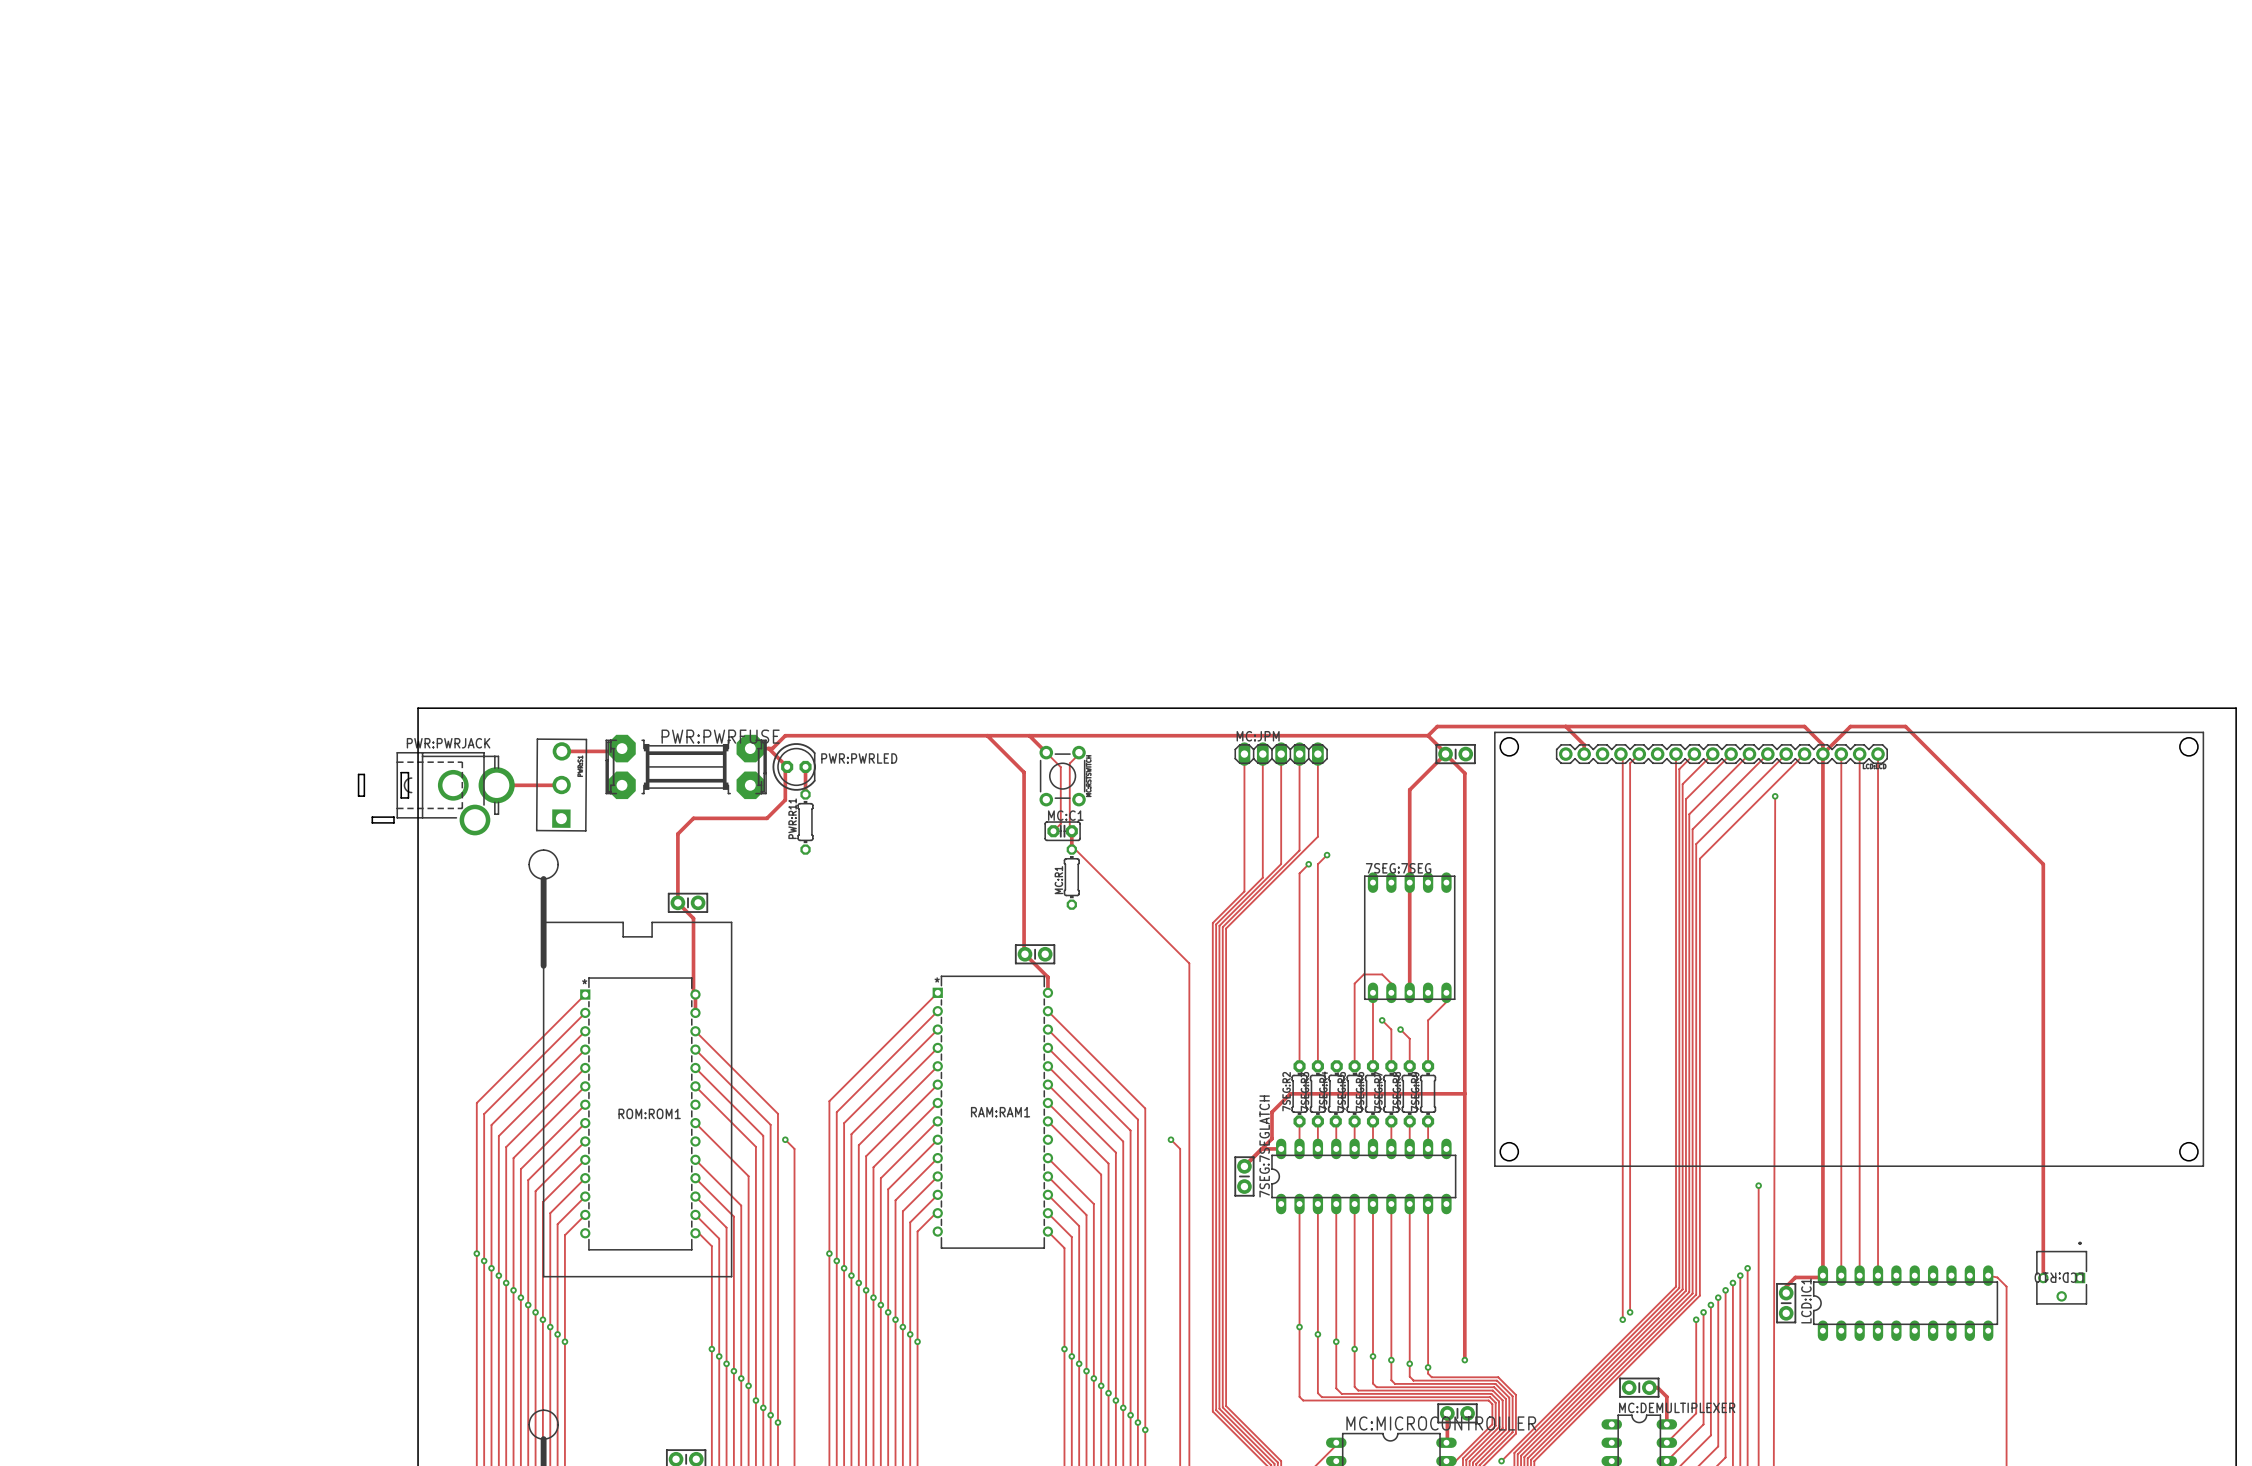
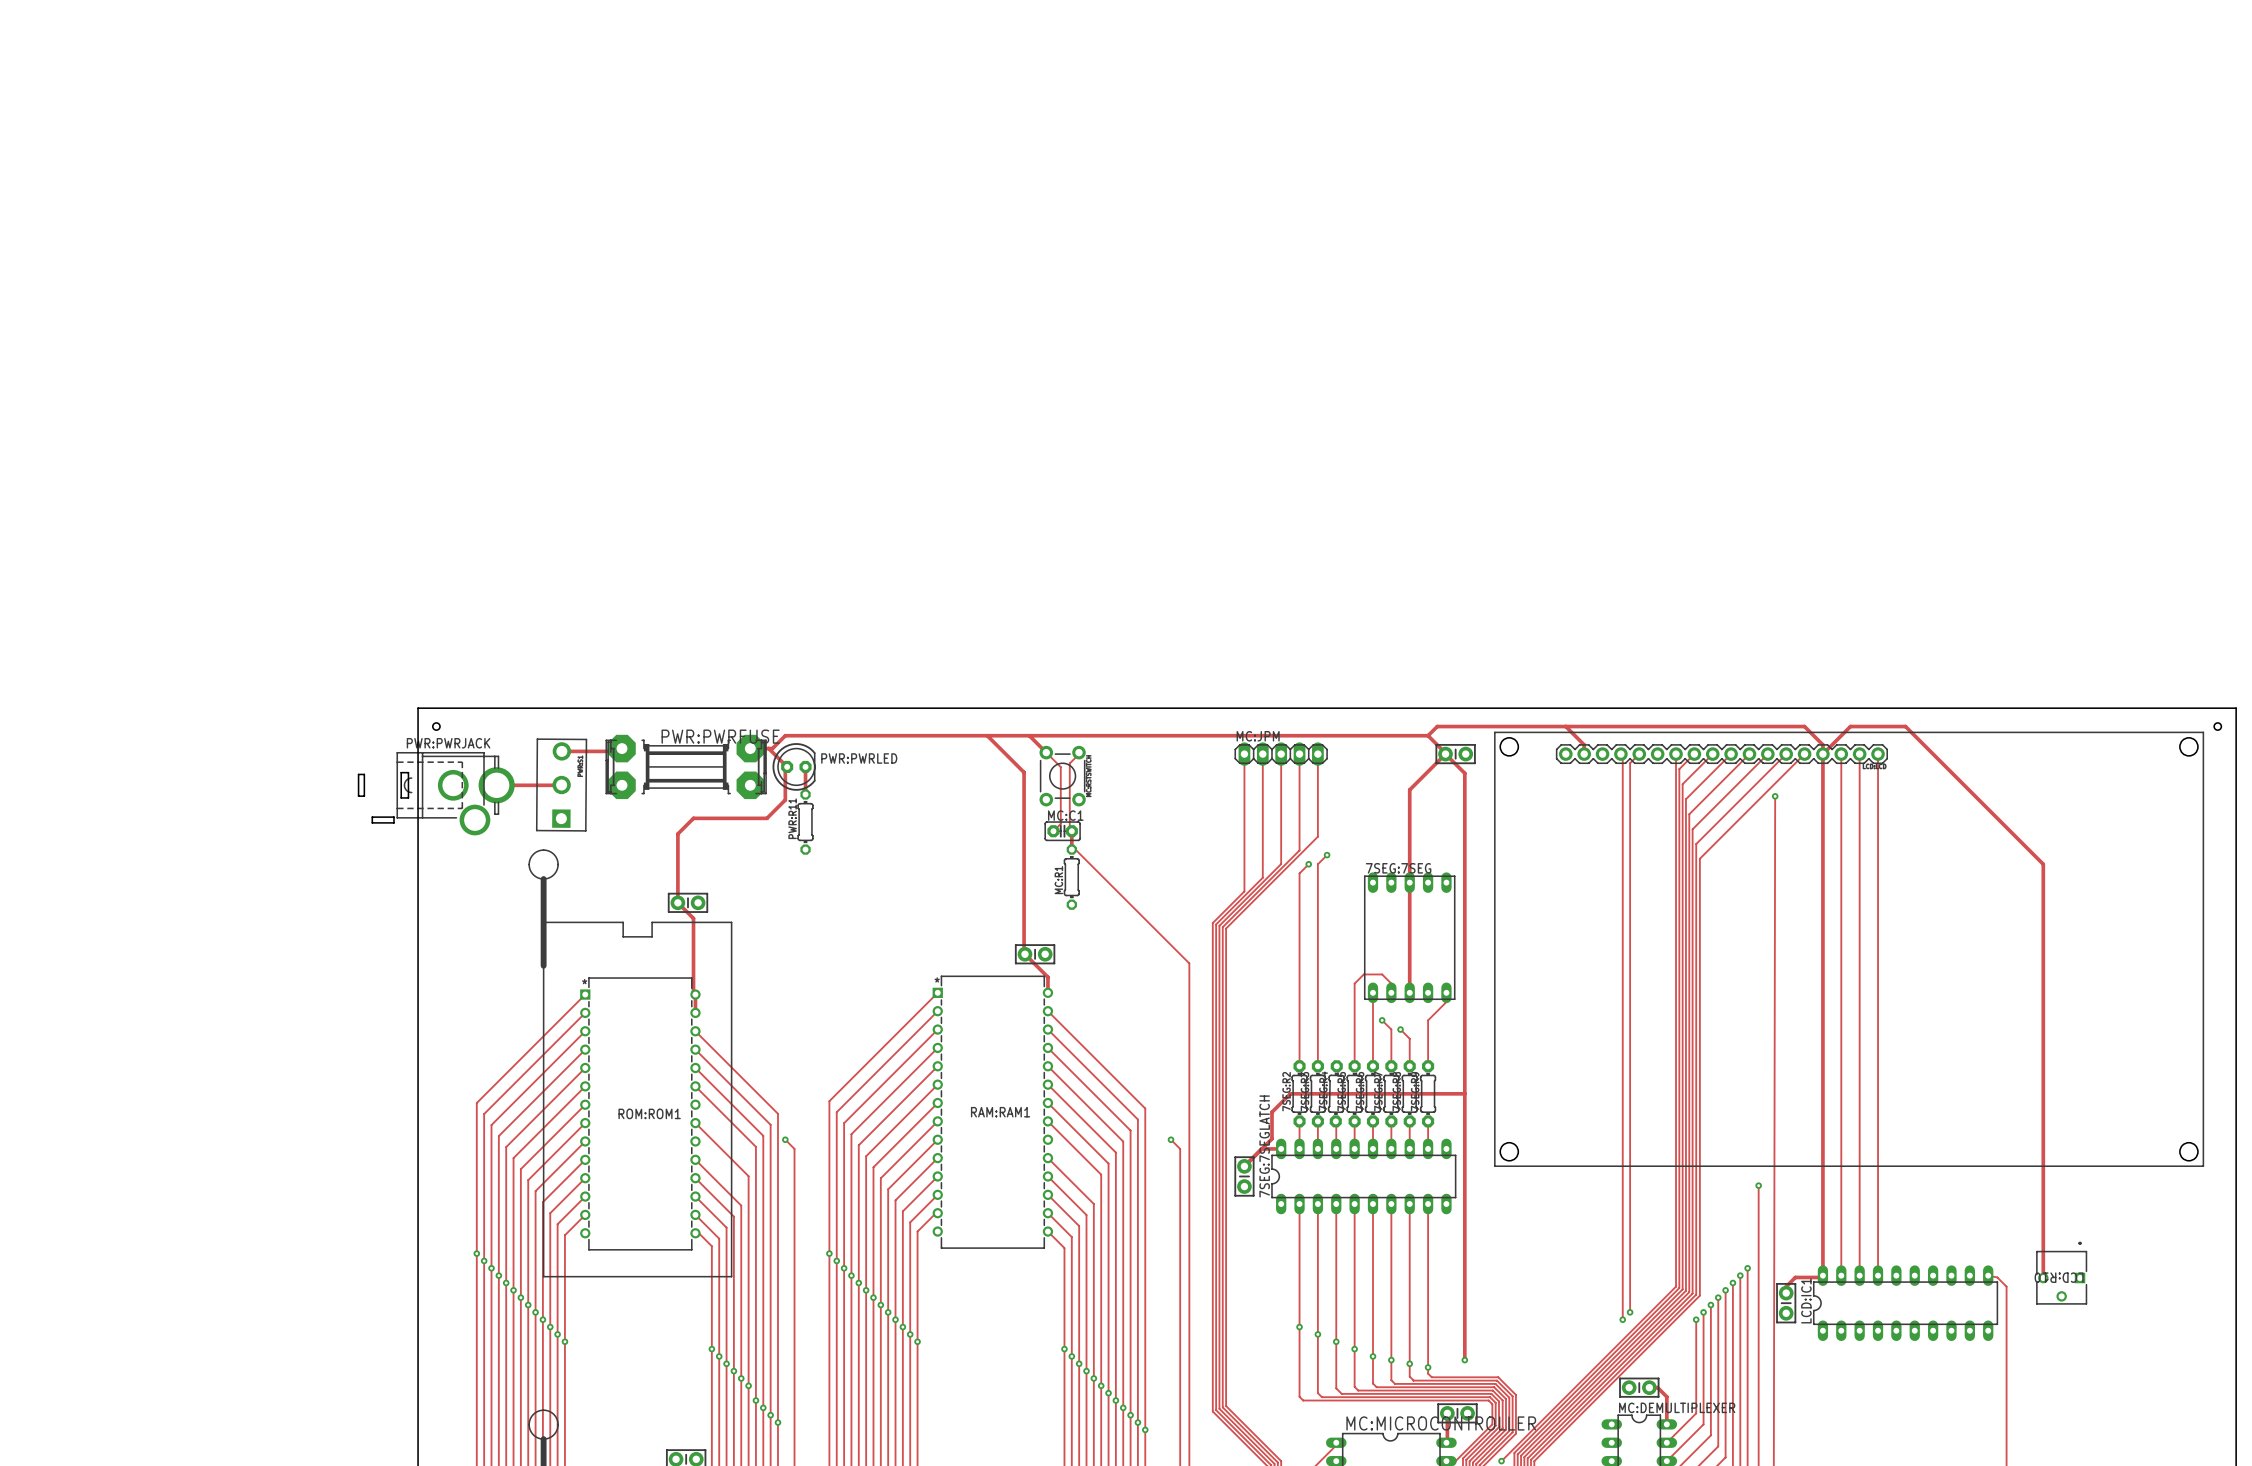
hole: none -> (436, 726)
hole: none -> (2217, 726)

